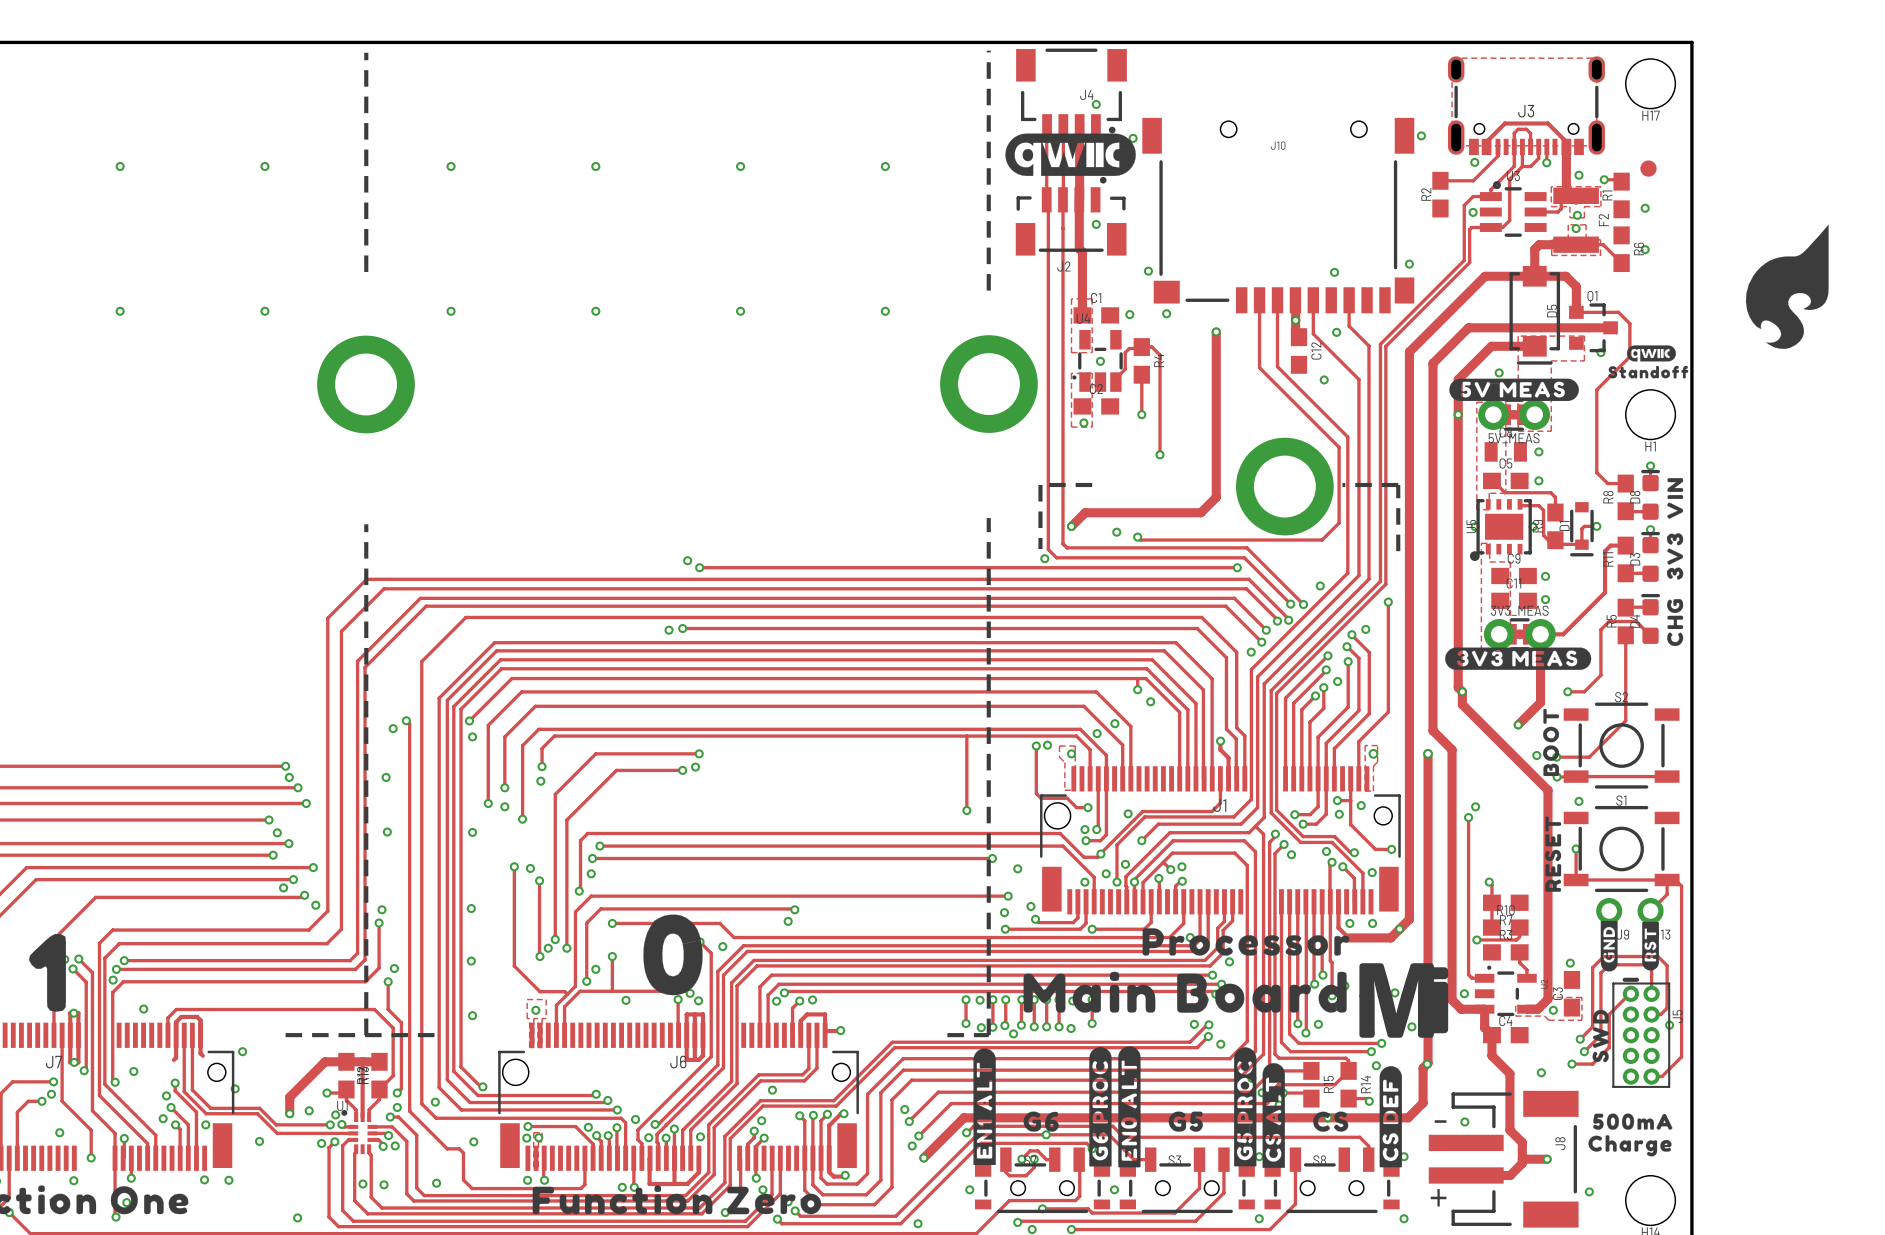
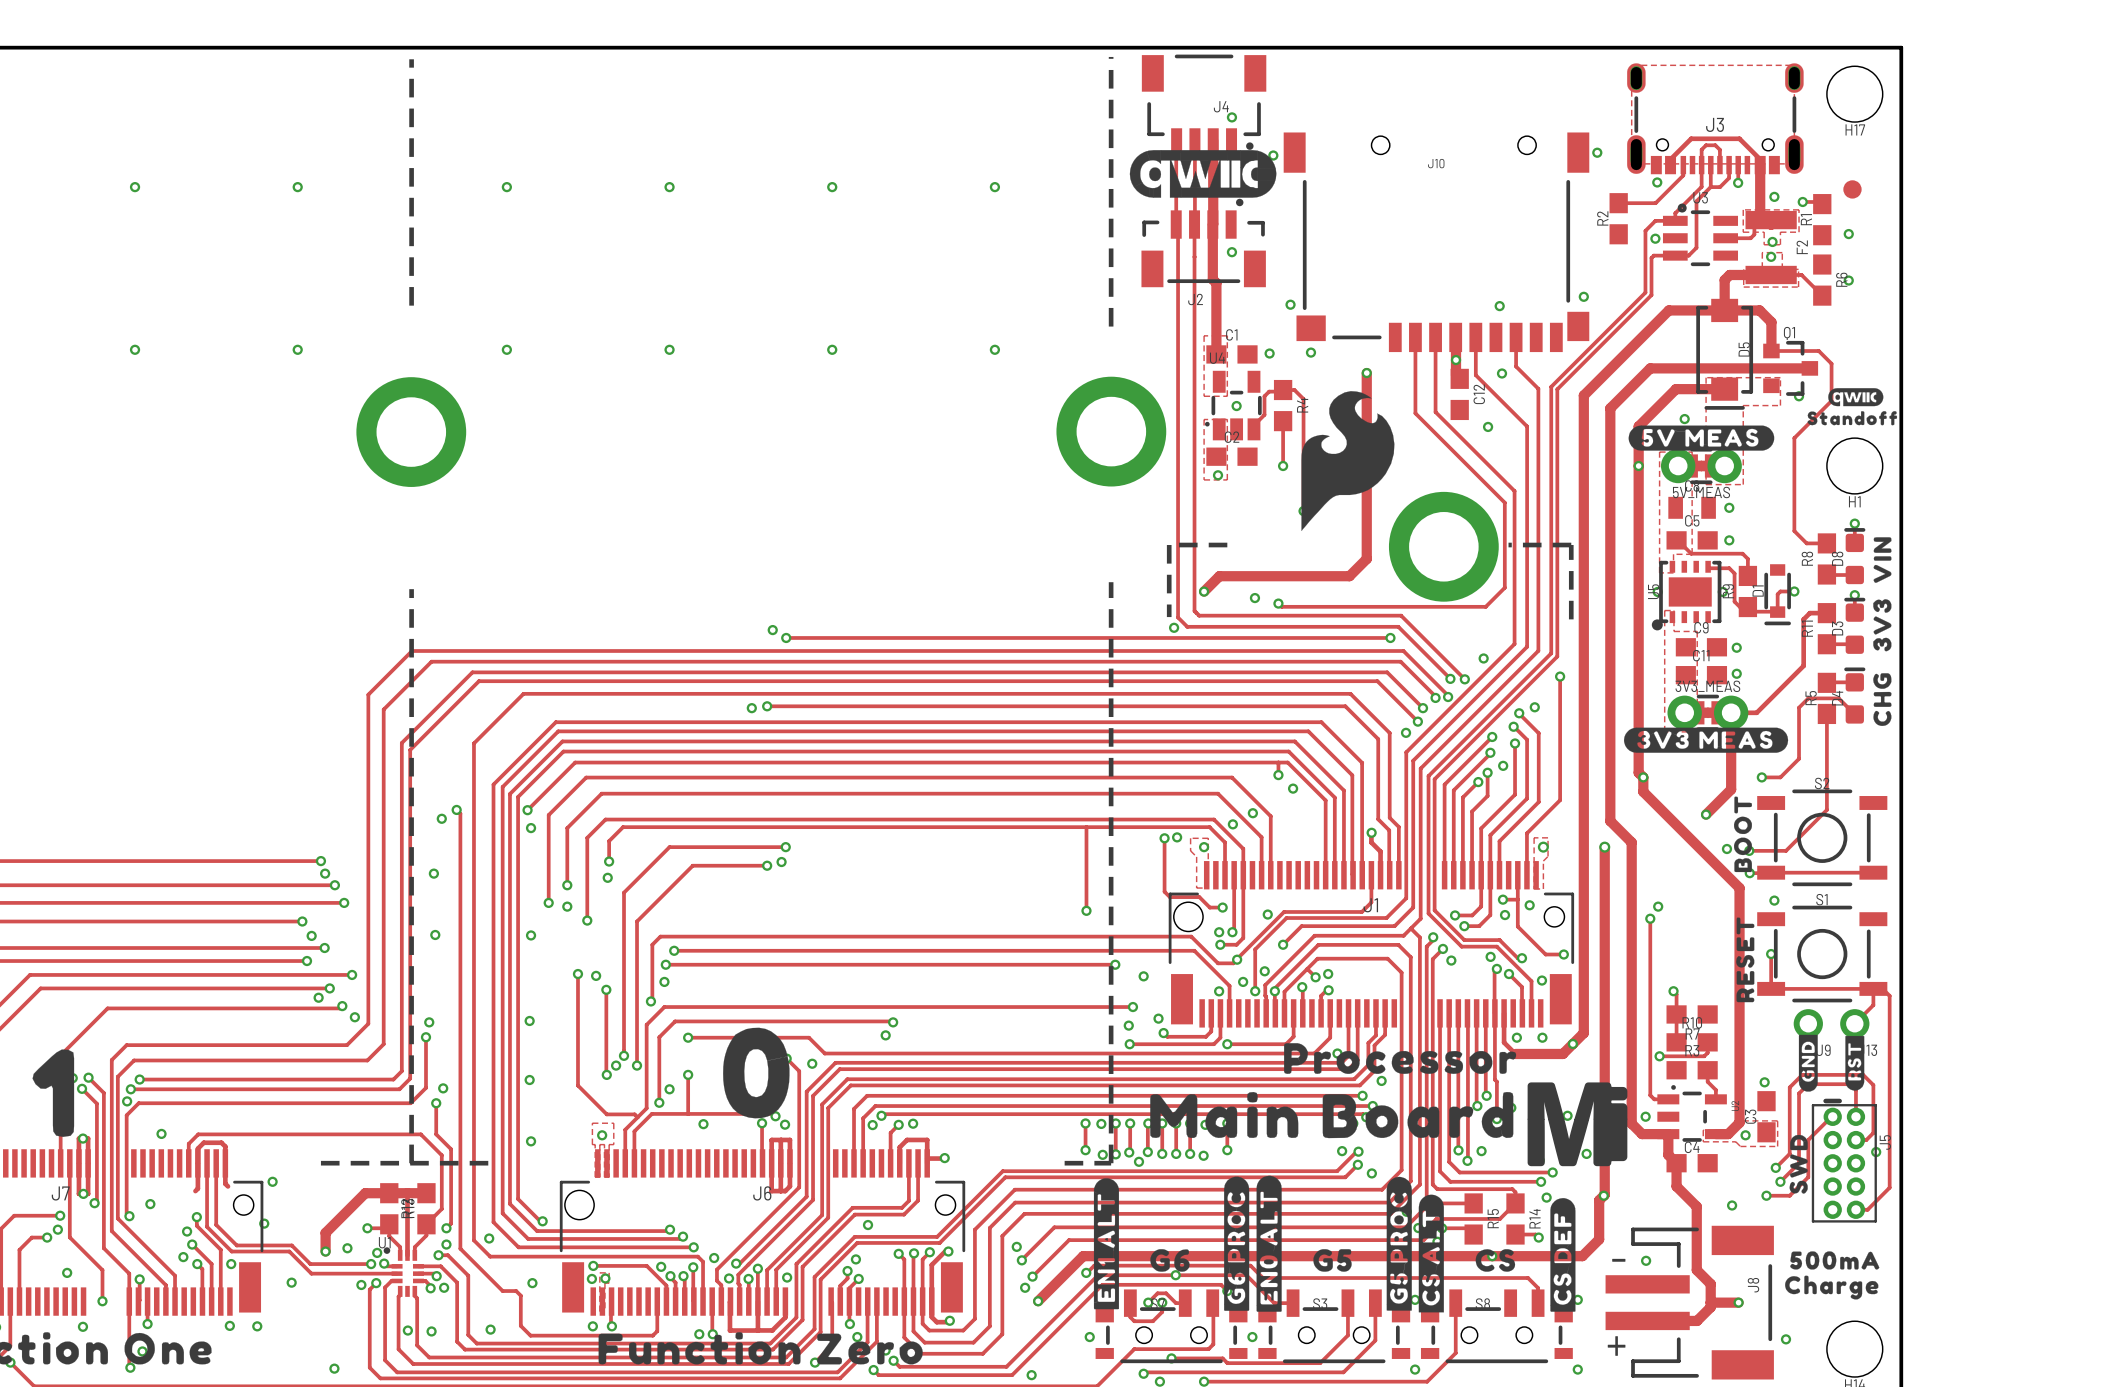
drawing: [1745, 224, 1829, 349] -> none
drawing: none -> [1301, 391, 1395, 531]

